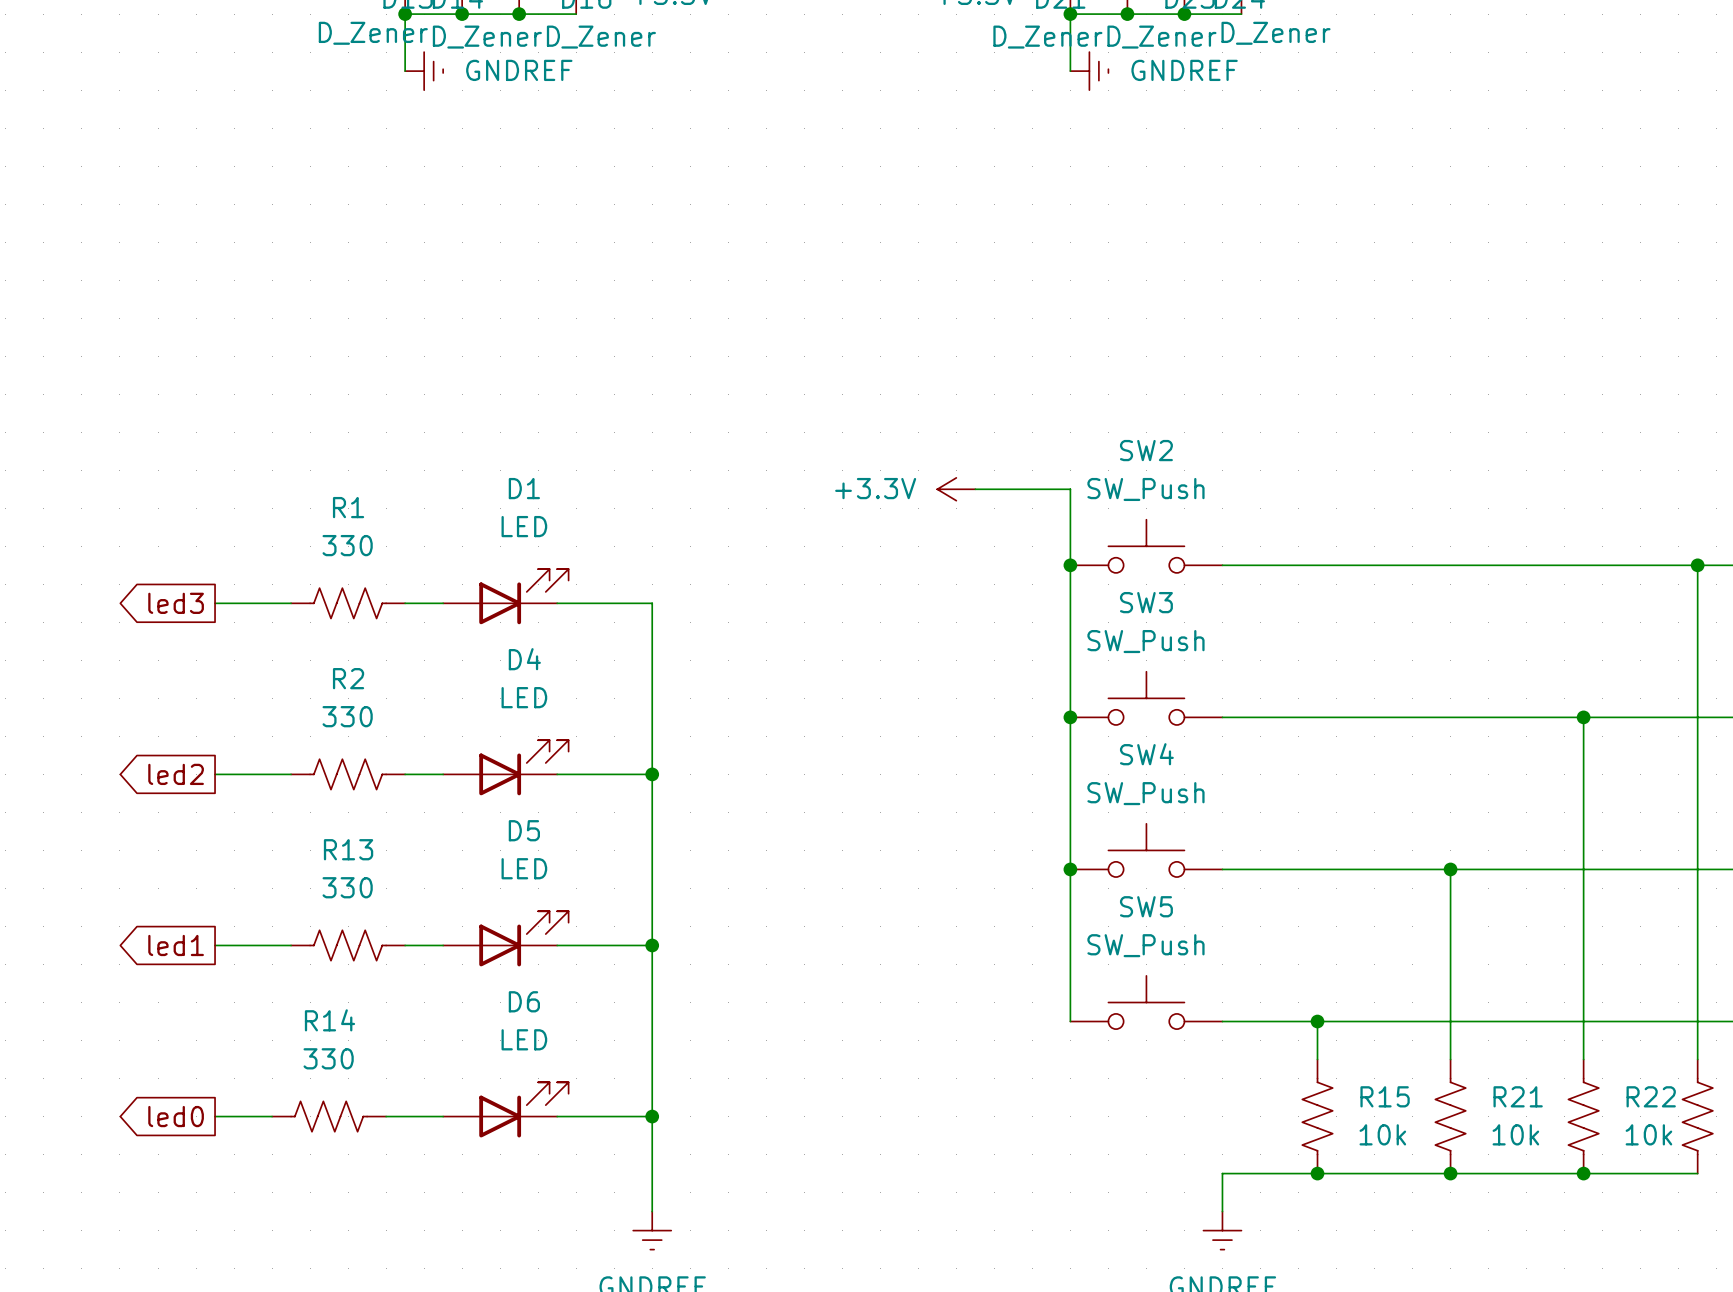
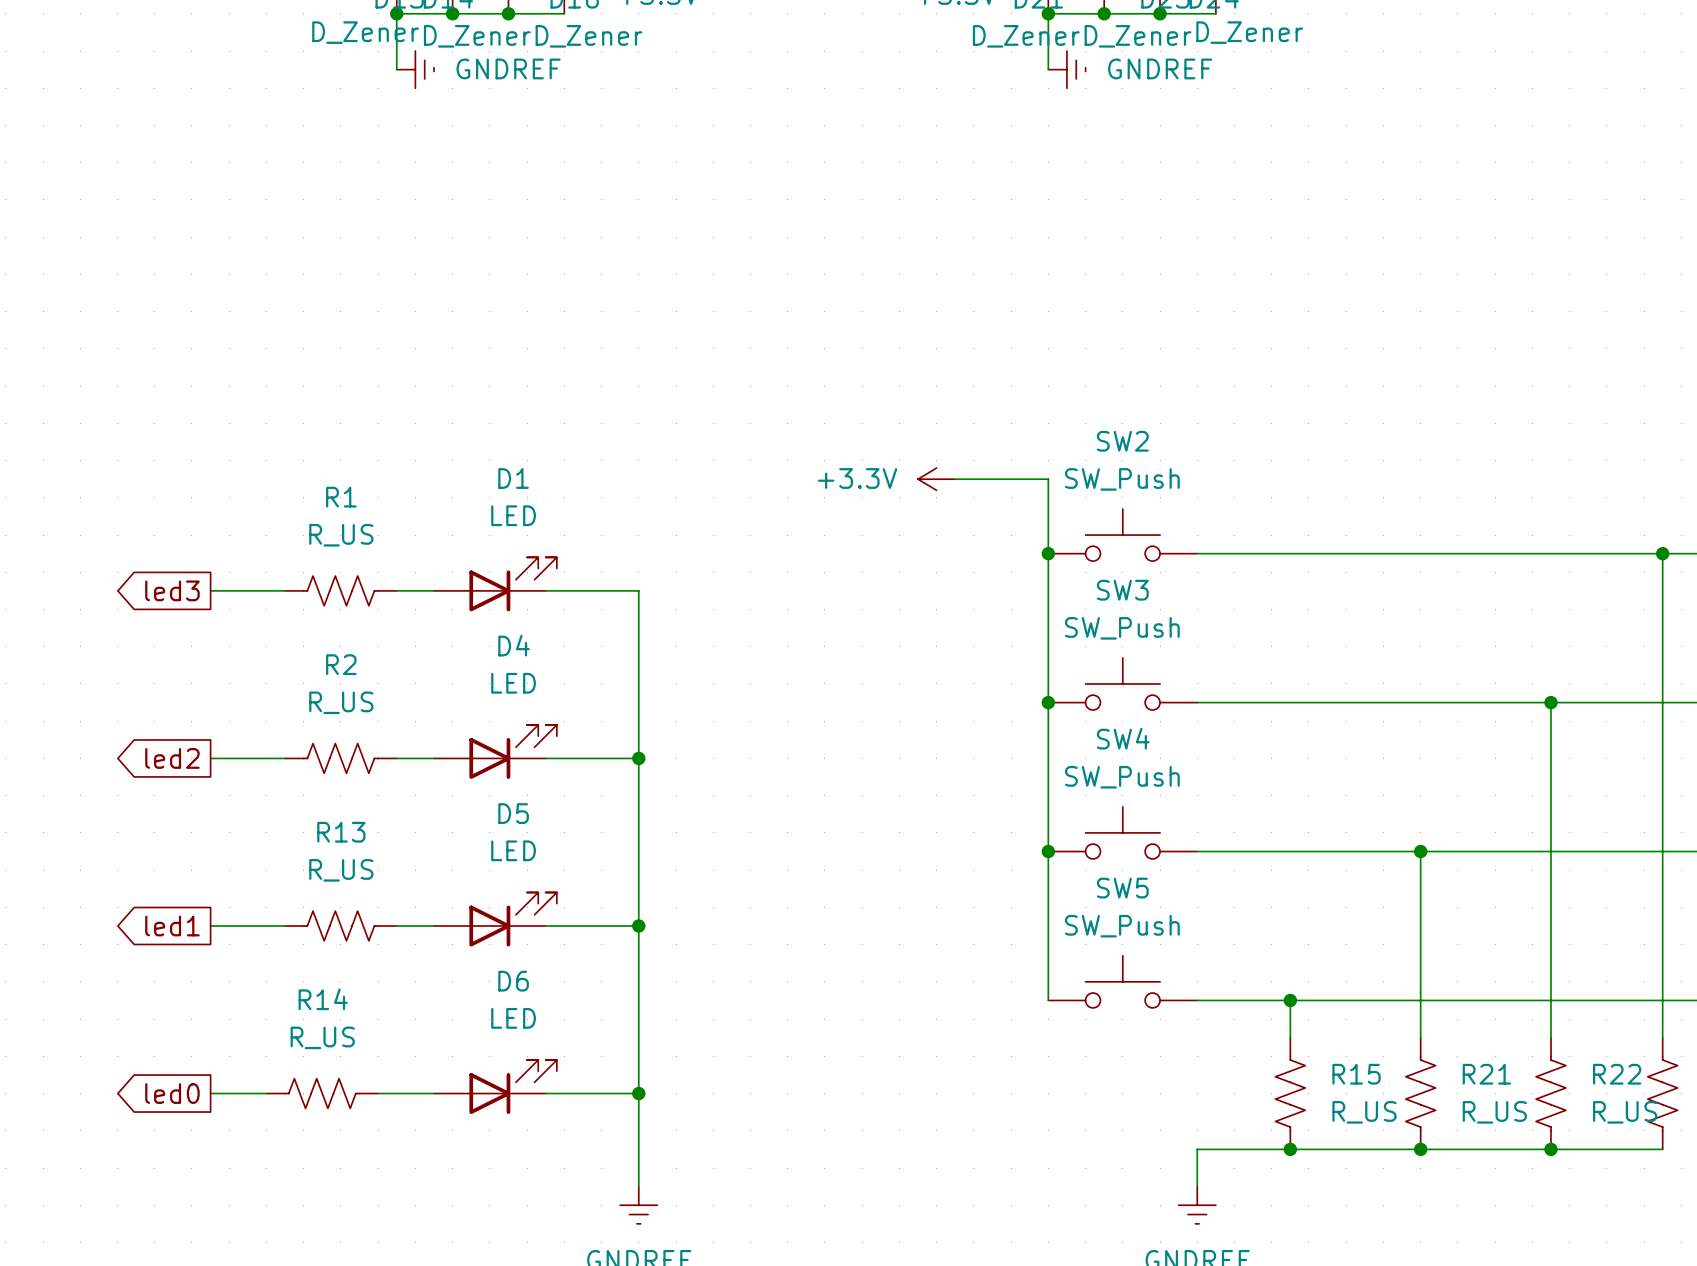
R1 value: 330 (347, 545) -> R_US (341, 535)
R2 value: 330 (347, 716) -> R_US (341, 702)
R13 value: 330 (347, 887) -> R_US (341, 870)
R14 value: 330 (328, 1058) -> R_US (322, 1037)
R15 value: 10k (1382, 1134) -> R_US (1364, 1112)
R21 value: 10k (1515, 1134) -> R_US (1494, 1112)
R22 value: 10k (1648, 1134) -> R_US (1625, 1112)

